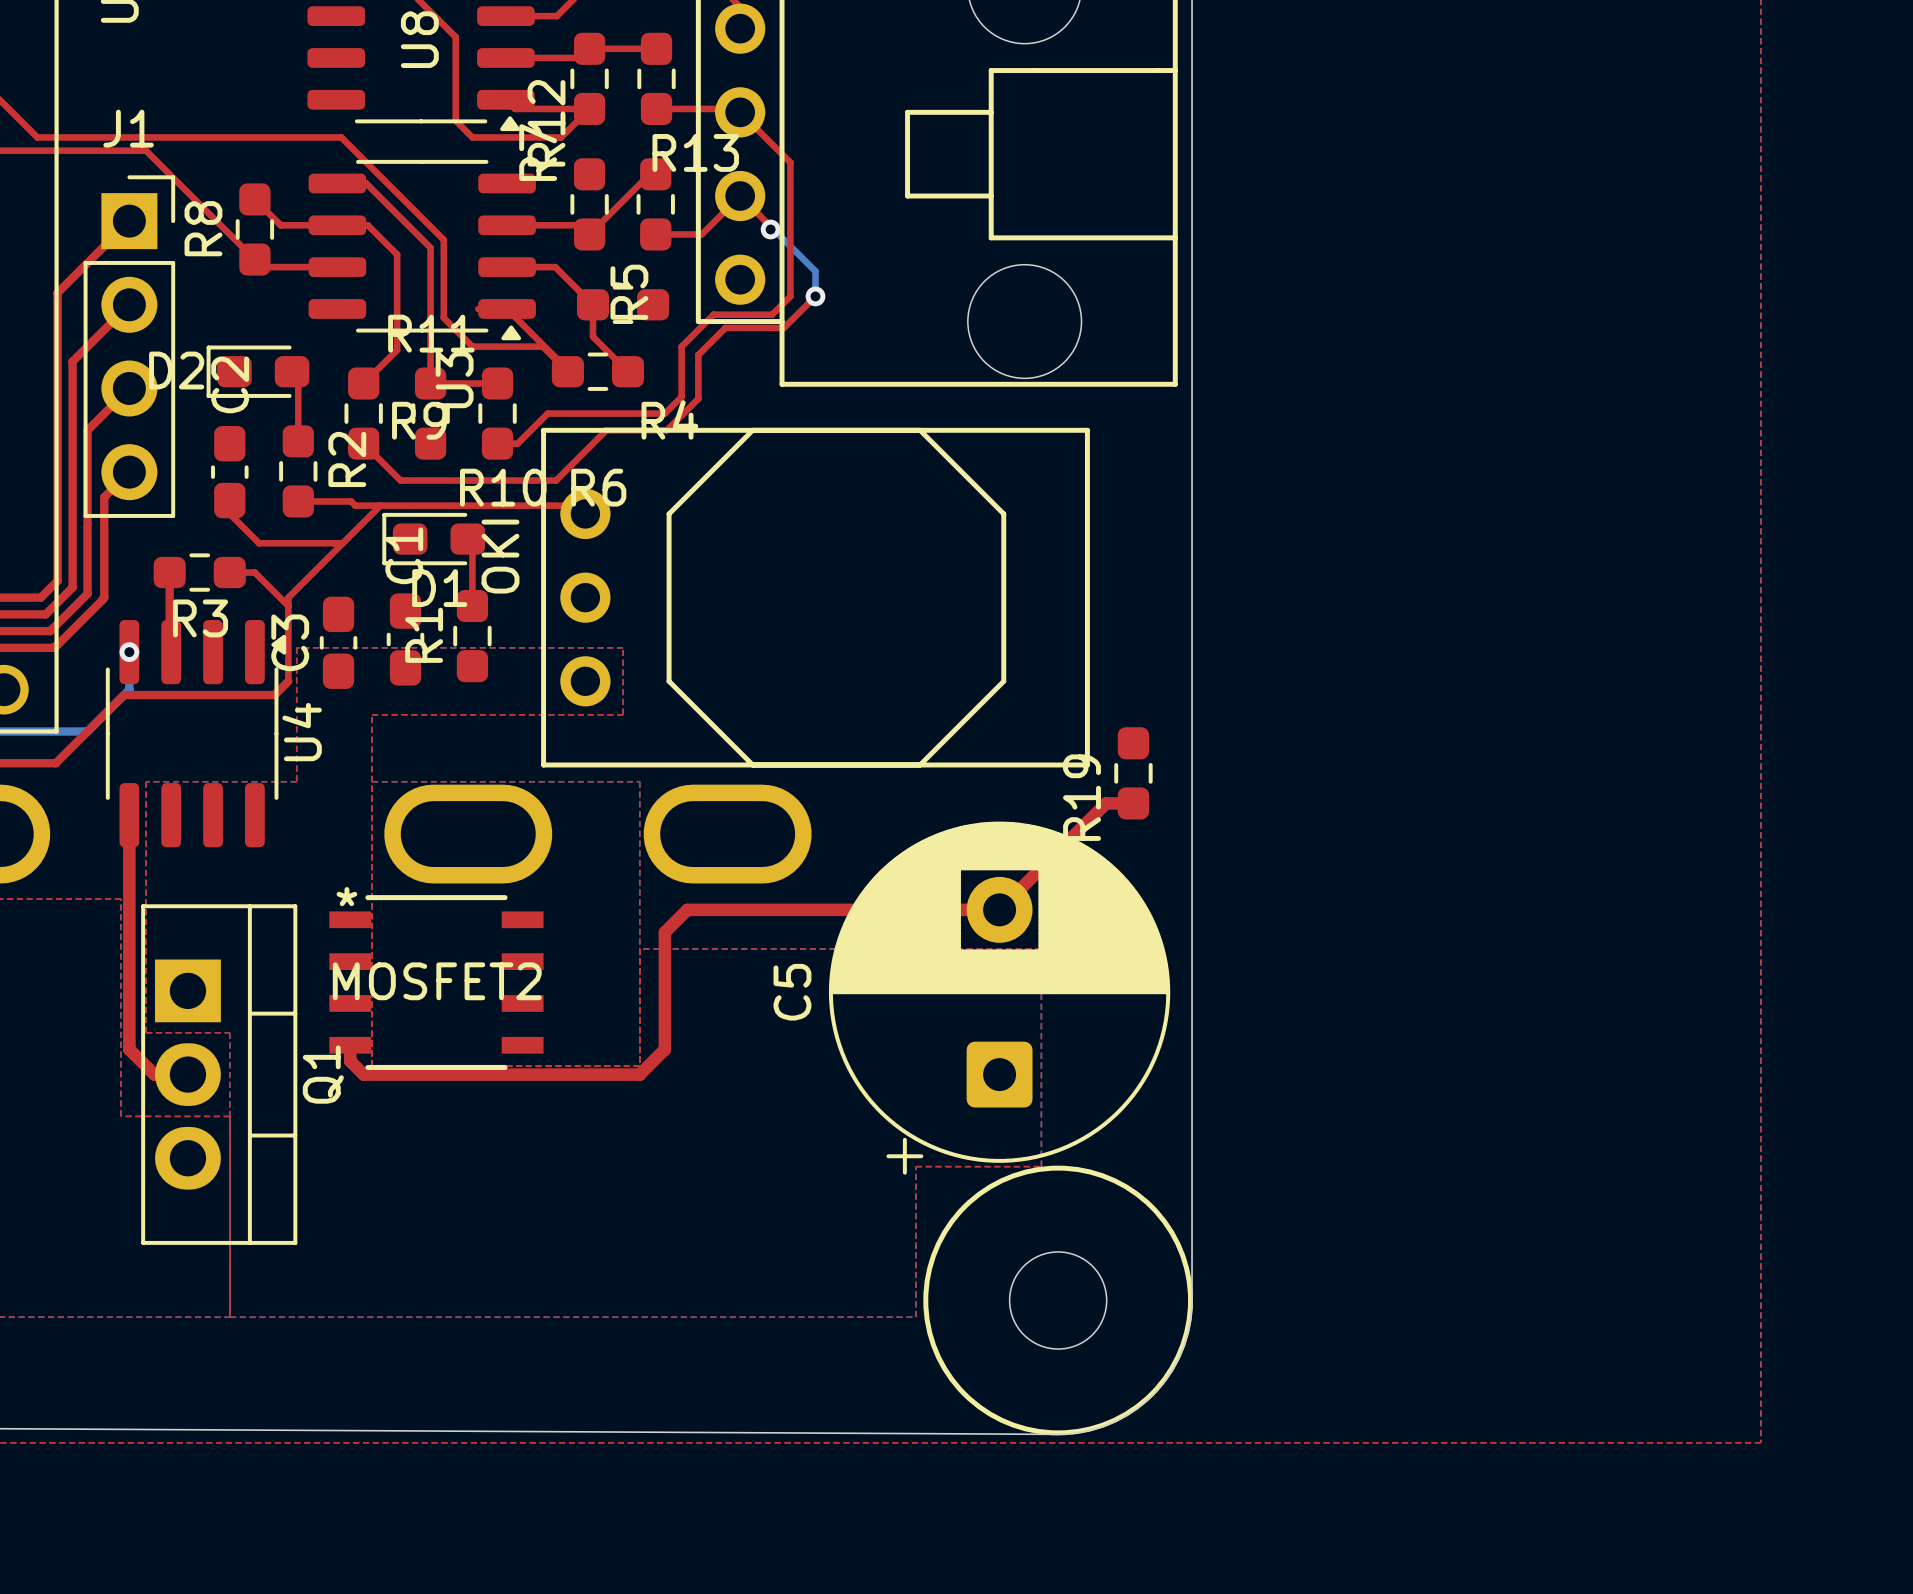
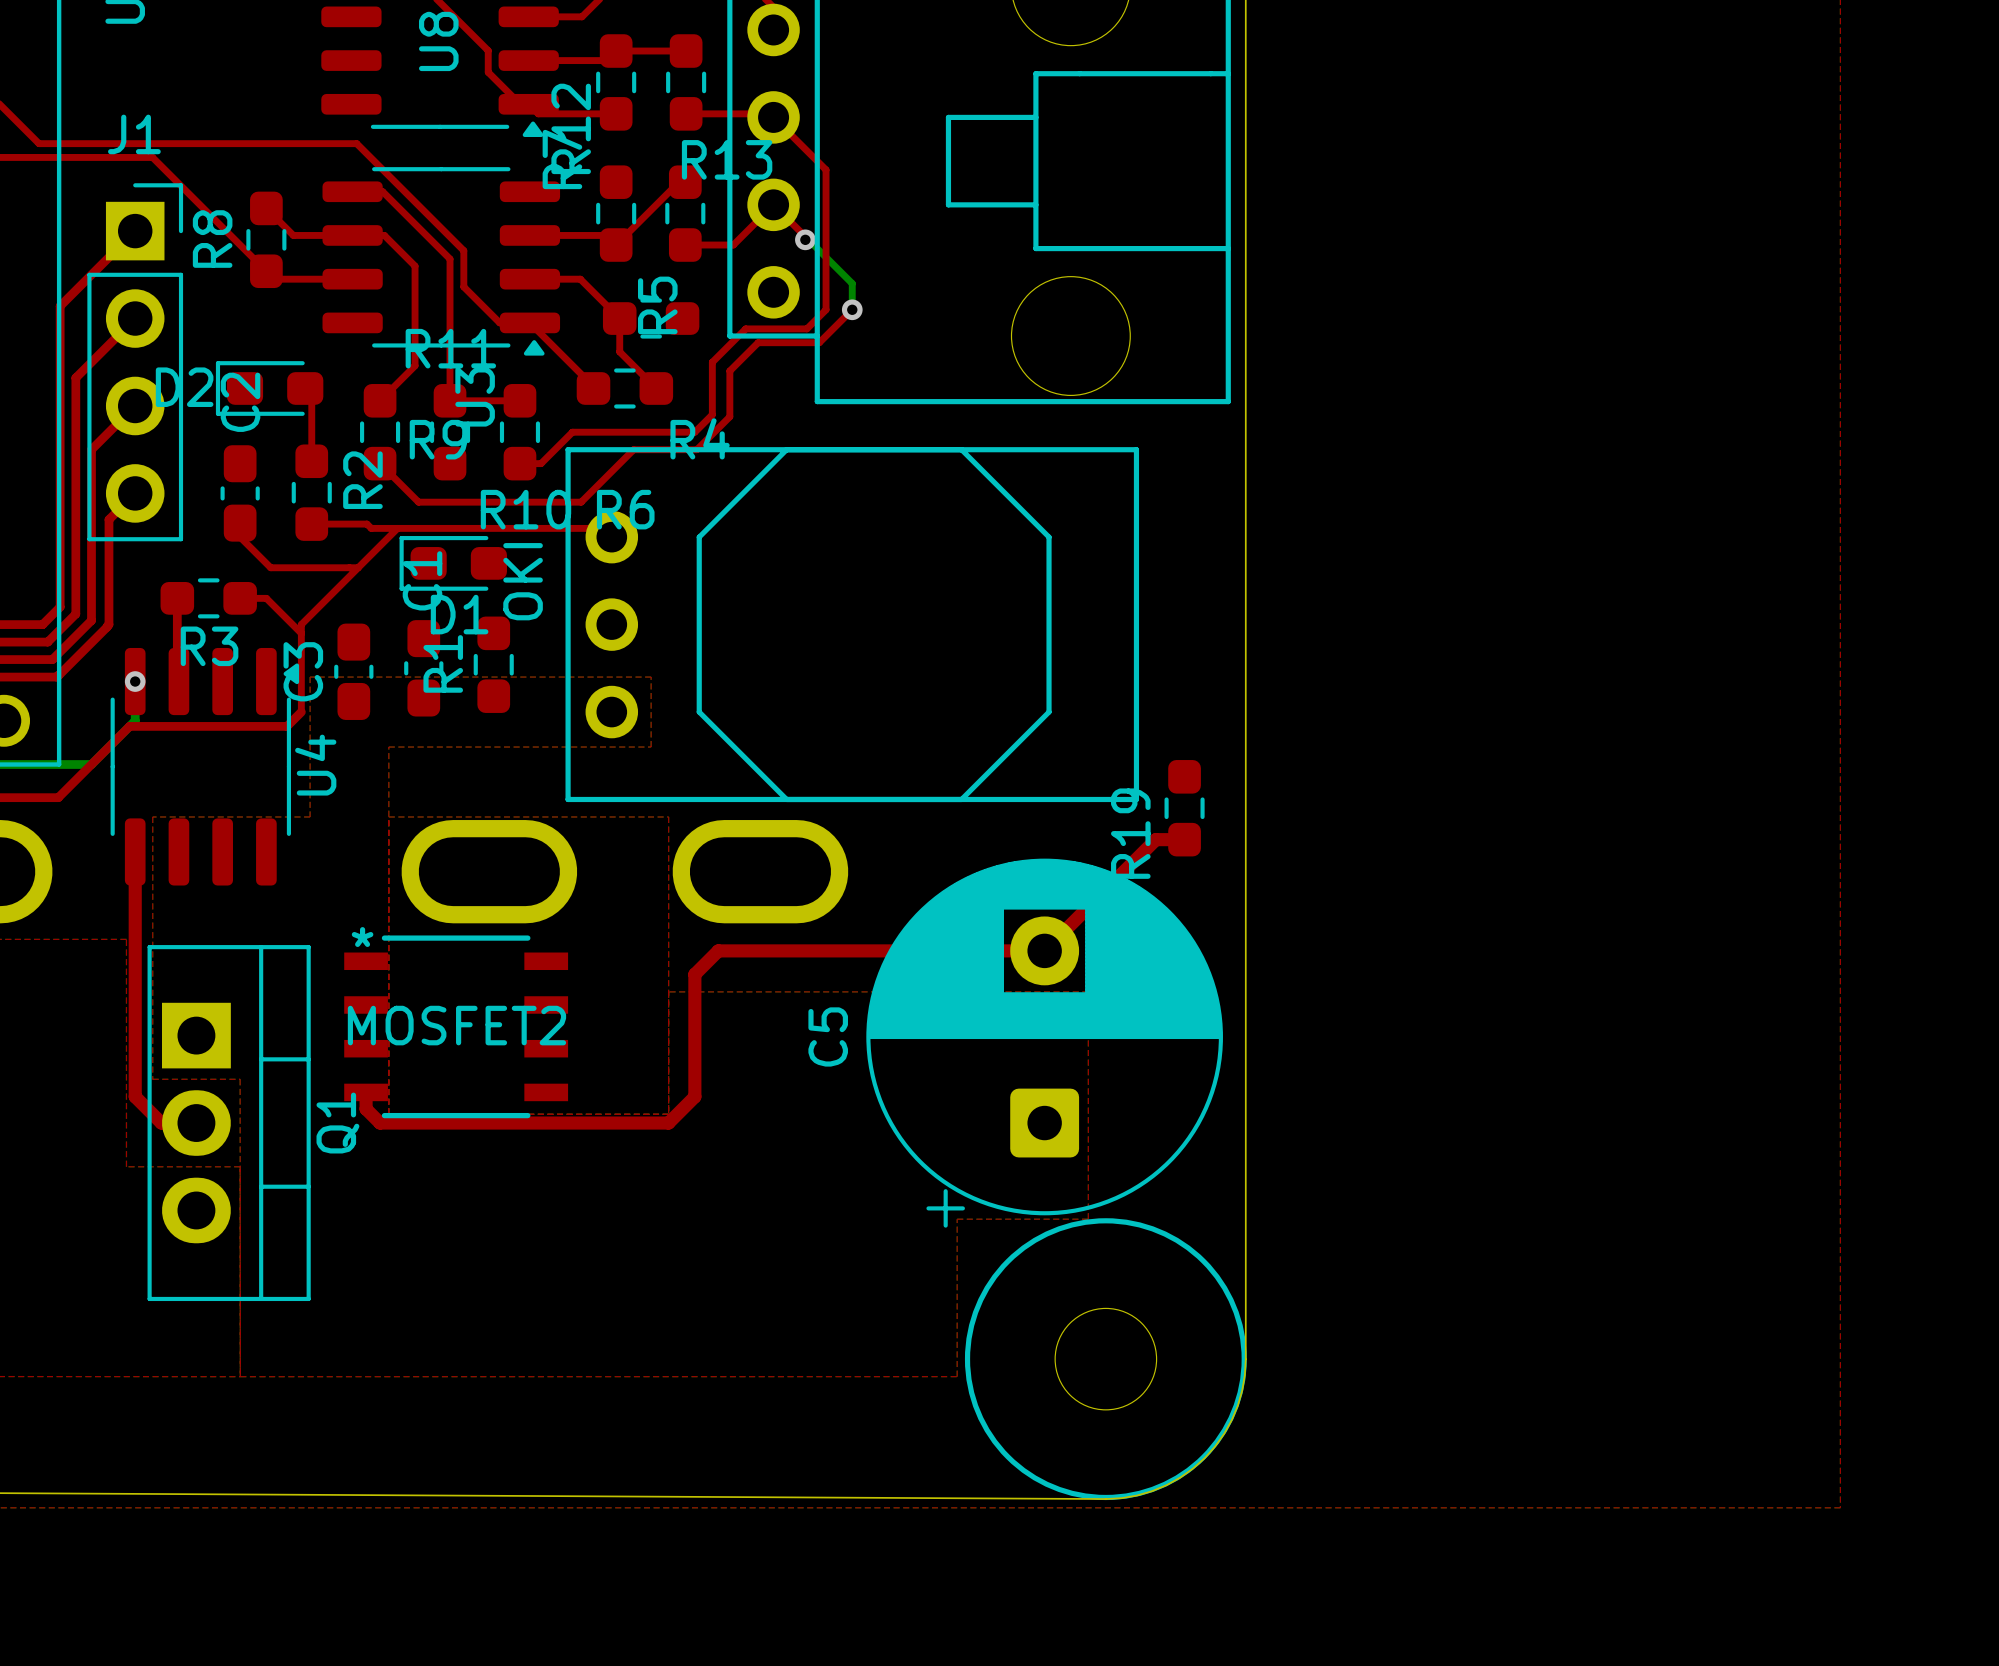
top track: (455, 37) (455, 120) (472, 137) (561, 137) (589, 108) -> (476, 38) (488, 50) (488, 72) (520, 104)
top track: (443, 274) (443, 318) (472, 346) (542, 346) (567, 371) -> (463, 286) (499, 322)
top track: (467, 539) (472, 543) (472, 606) -> none

